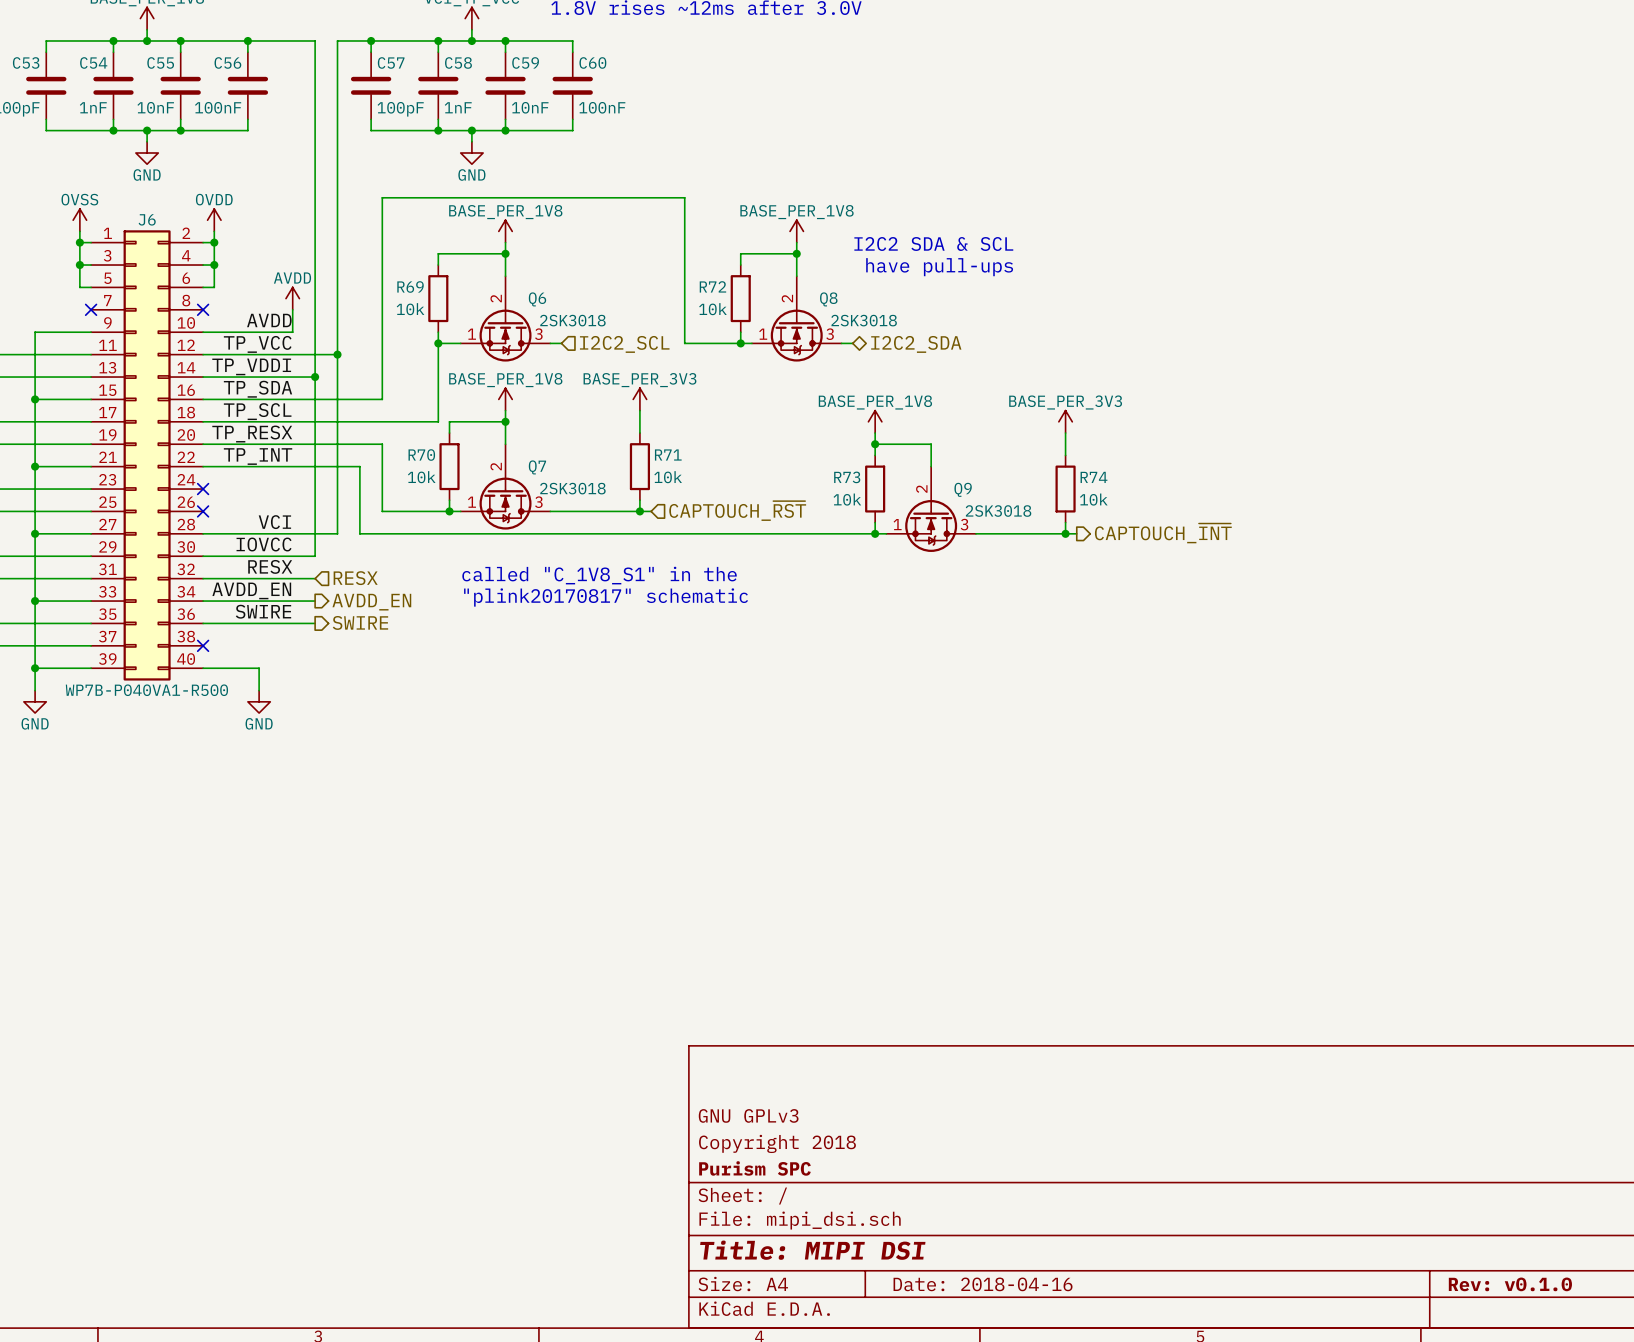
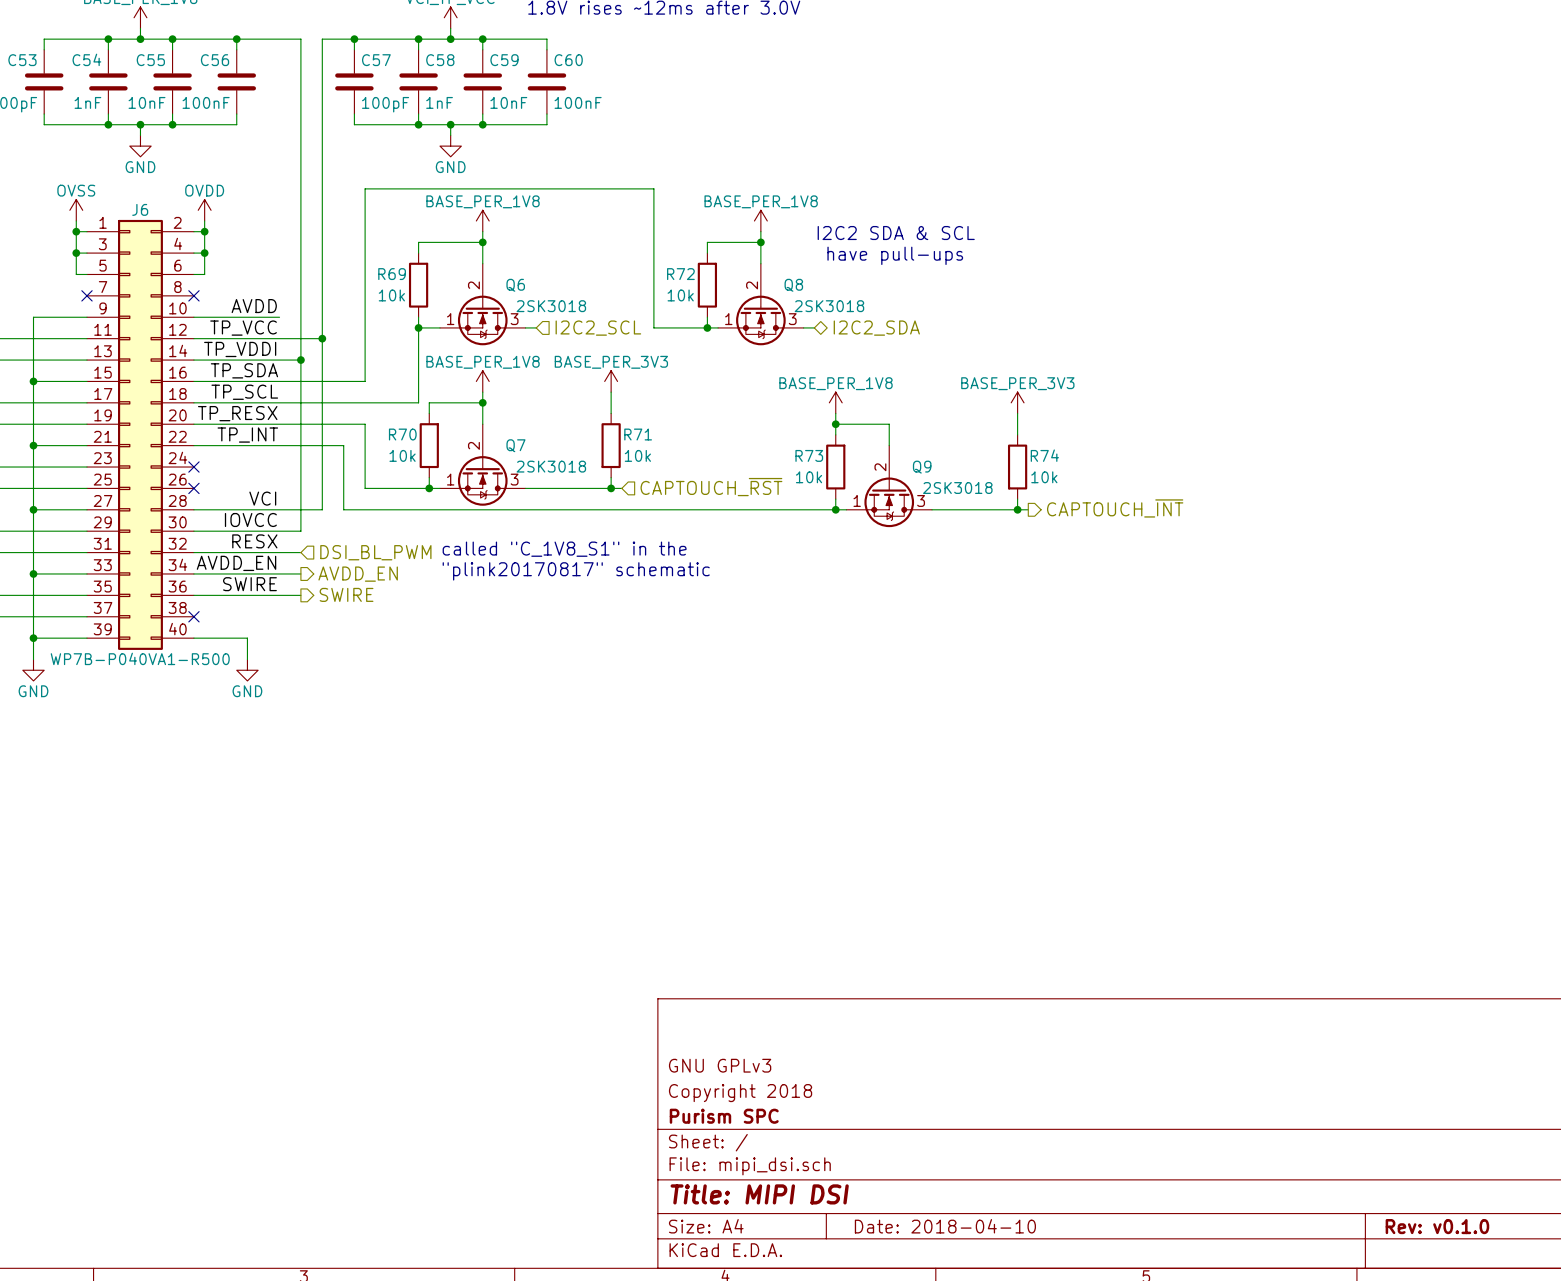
power symbol: AVDD (292, 298) -> none
wire: (292, 309) (292, 332) -> none
hierarchical label: RESX (355, 578) -> DSI_BL_PWM (375, 552)
title block: Date: 2018-04-16 (983, 1284) -> Date: 2018-04-10 (945, 1226)

